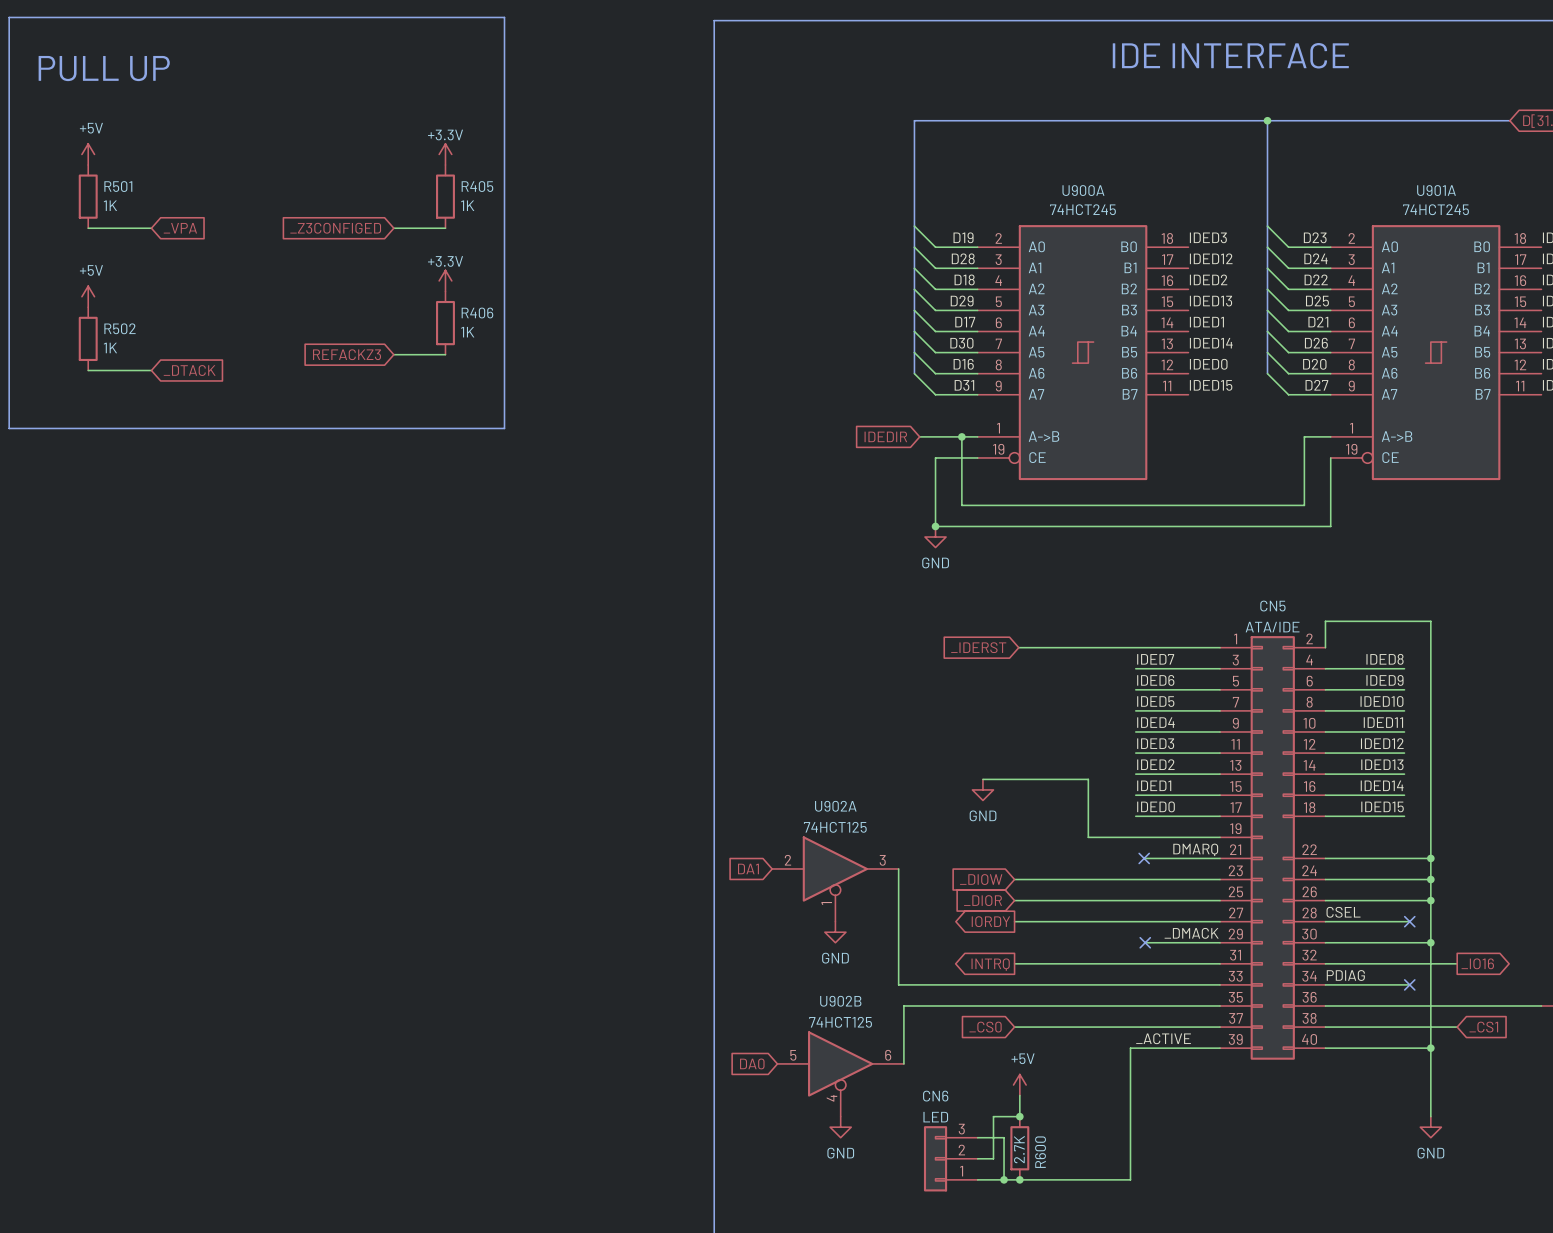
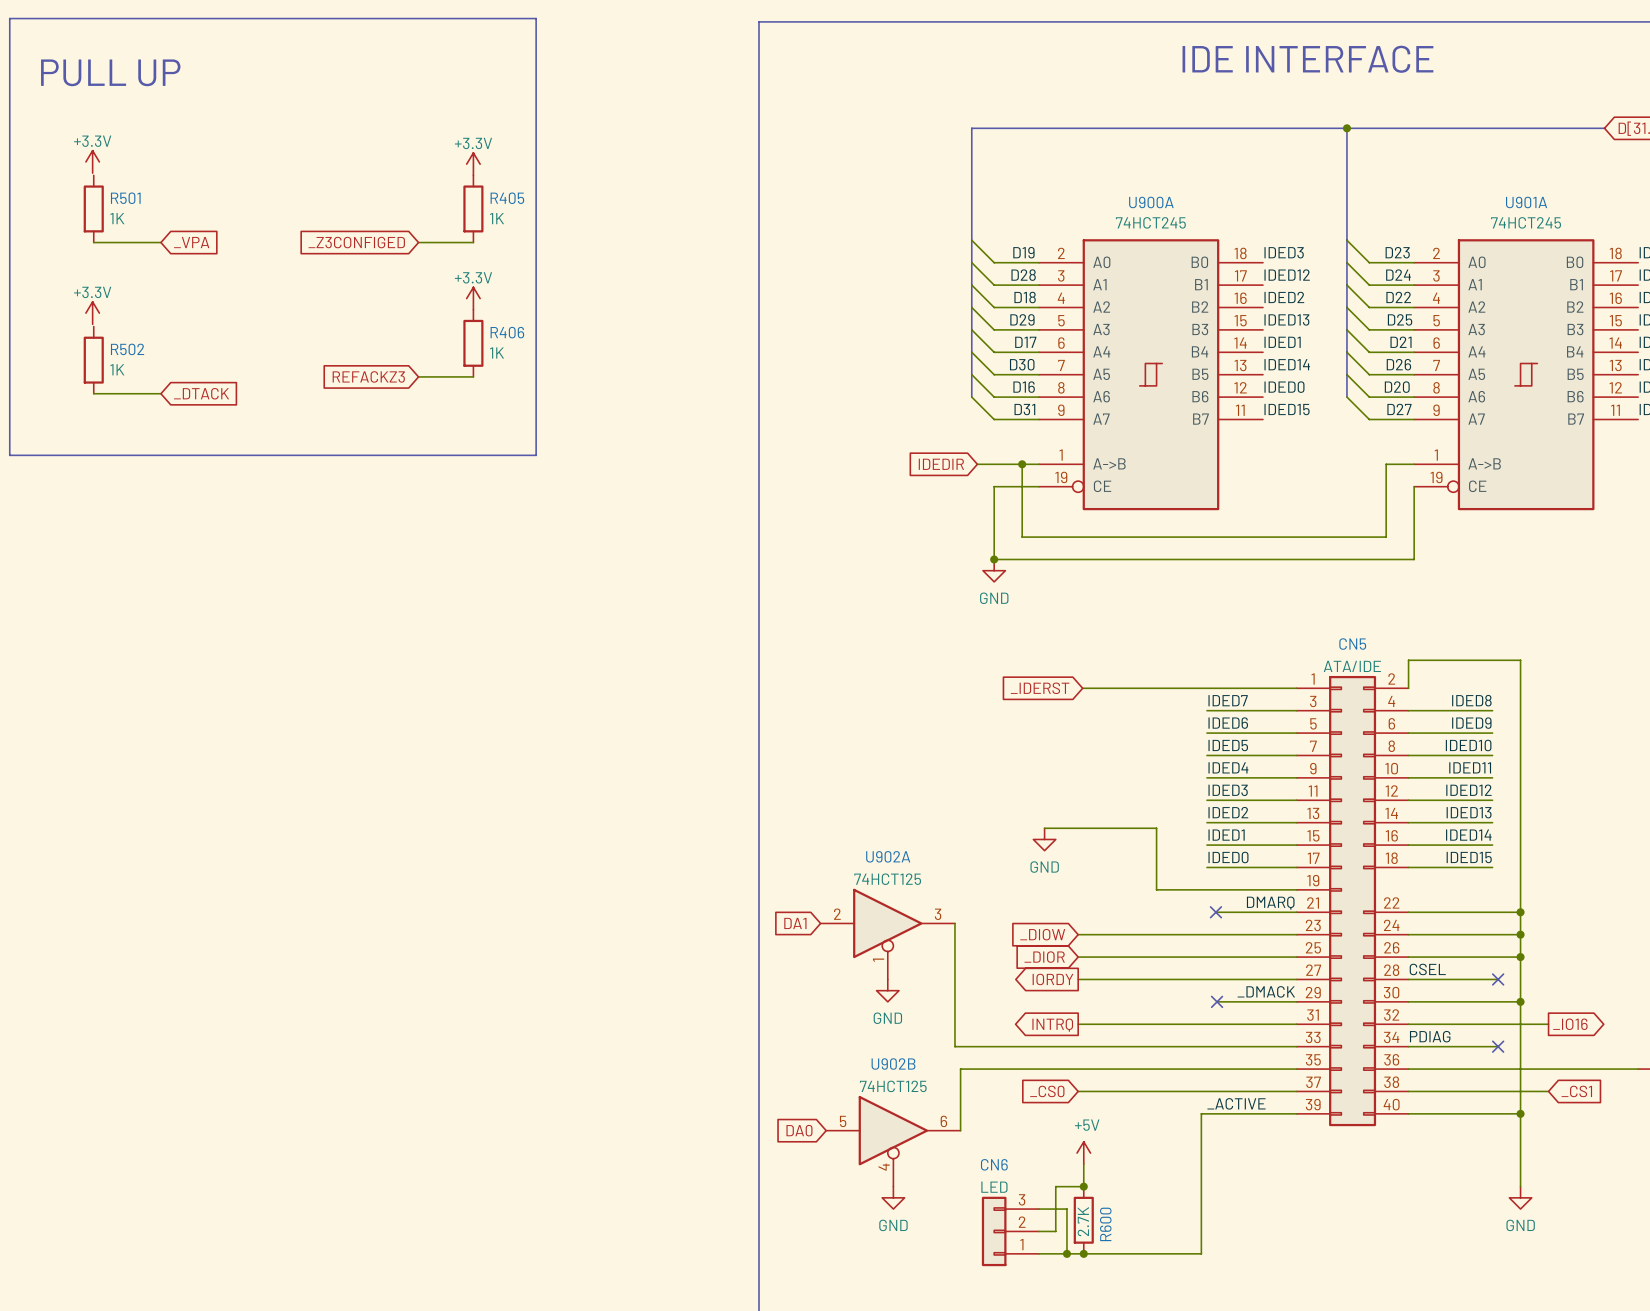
power symbol: +5V (88, 154) -> +3.3V (92, 161)
power symbol: +5V (88, 296) -> +3.3V (92, 313)

